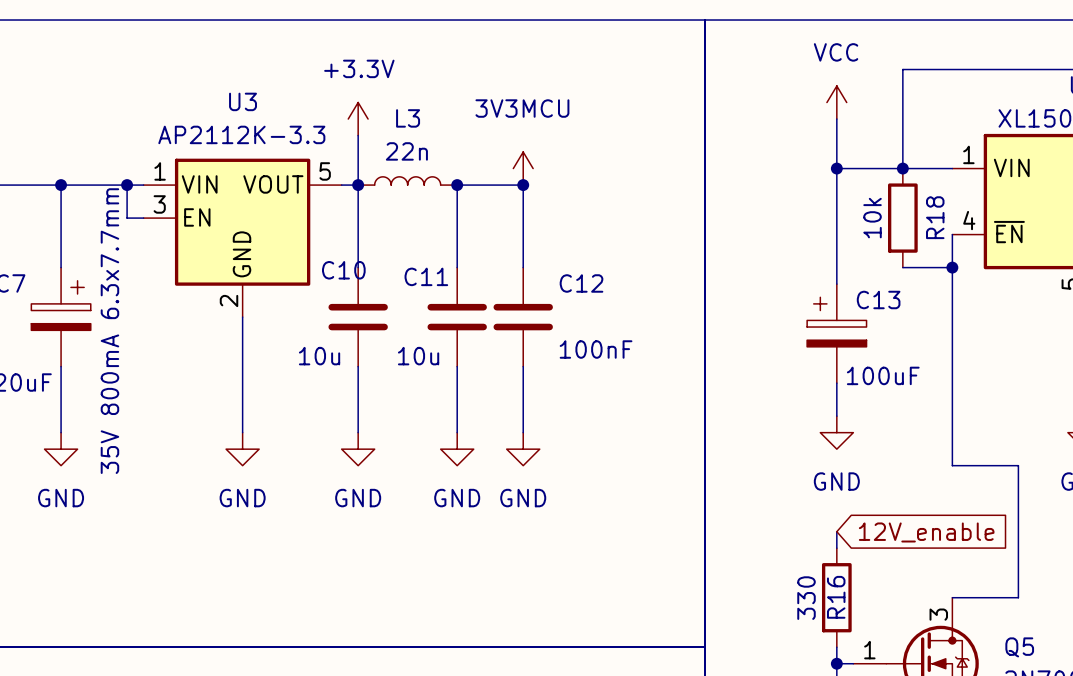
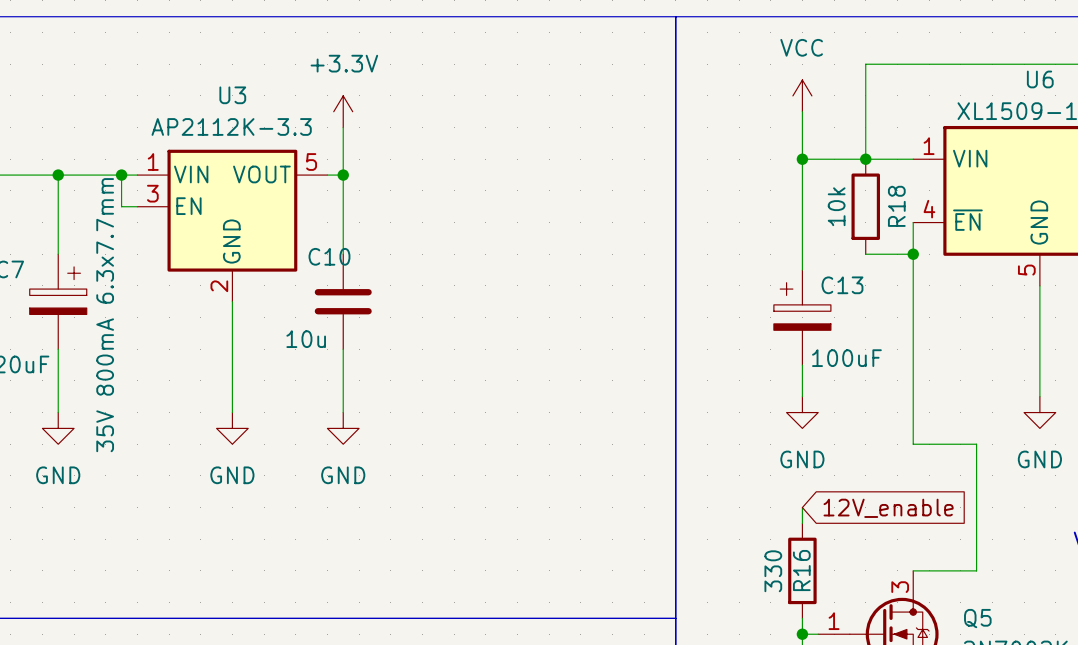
power symbol: 3V3MCU (523, 168) -> none
L3: 22n (407, 180) -> none
junction: (457, 185) -> none
junction: (523, 185) -> none
wire: (457, 267) (457, 185) (523, 185) (523, 267) -> none
C11: 10u (457, 317) -> none
C12: 100nF (523, 317) -> none
wire: (457, 366) (457, 432) -> none
wire: (523, 366) (523, 432) -> none
power symbol: GND (457, 449) -> none
power symbol: GND (523, 449) -> none

